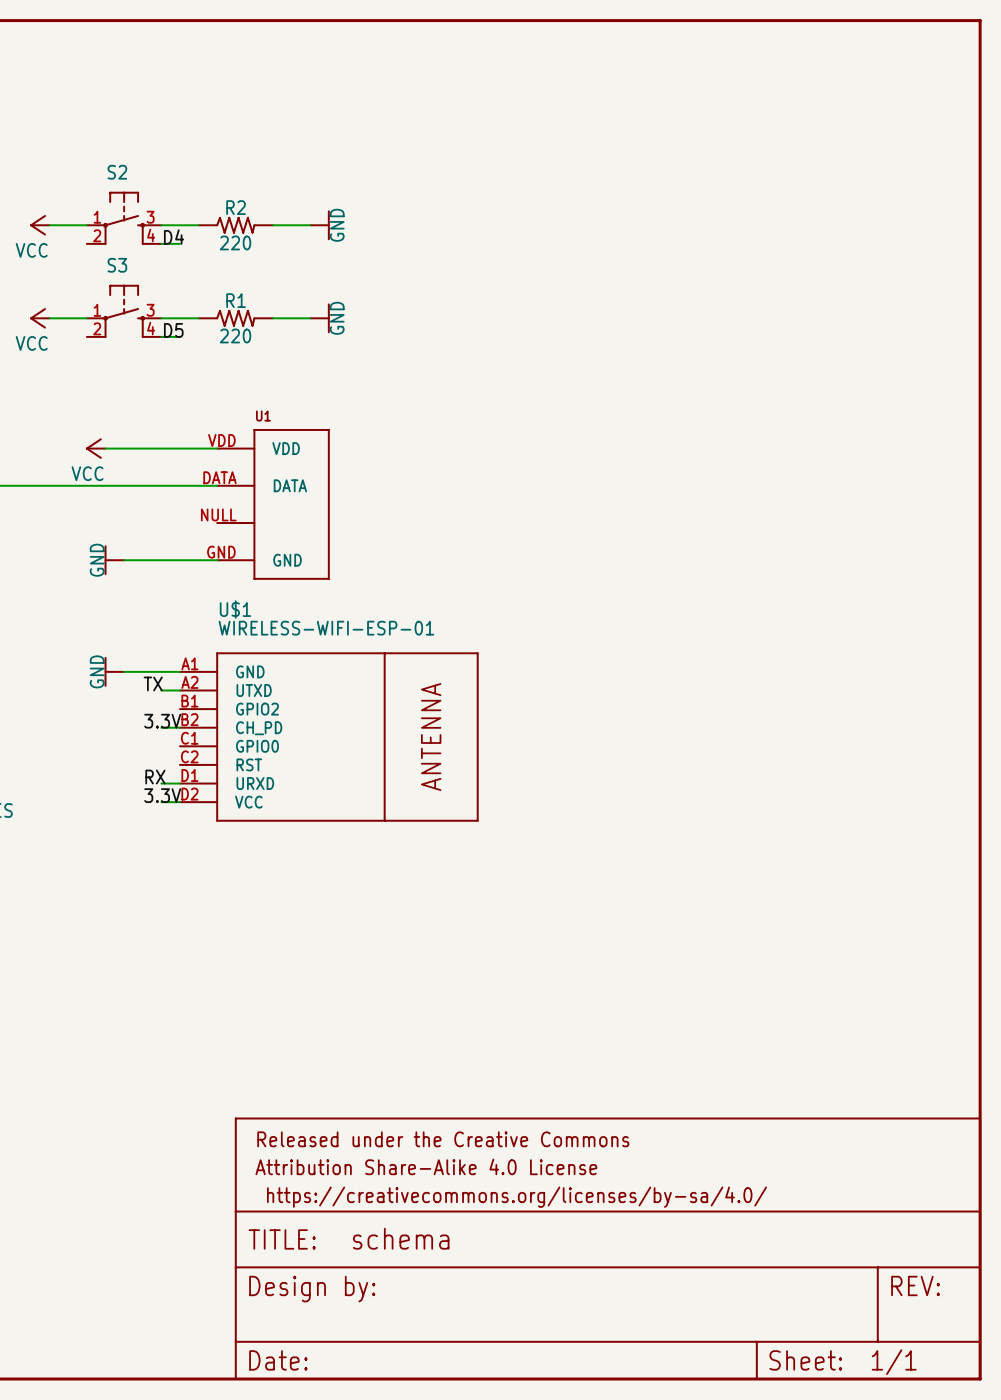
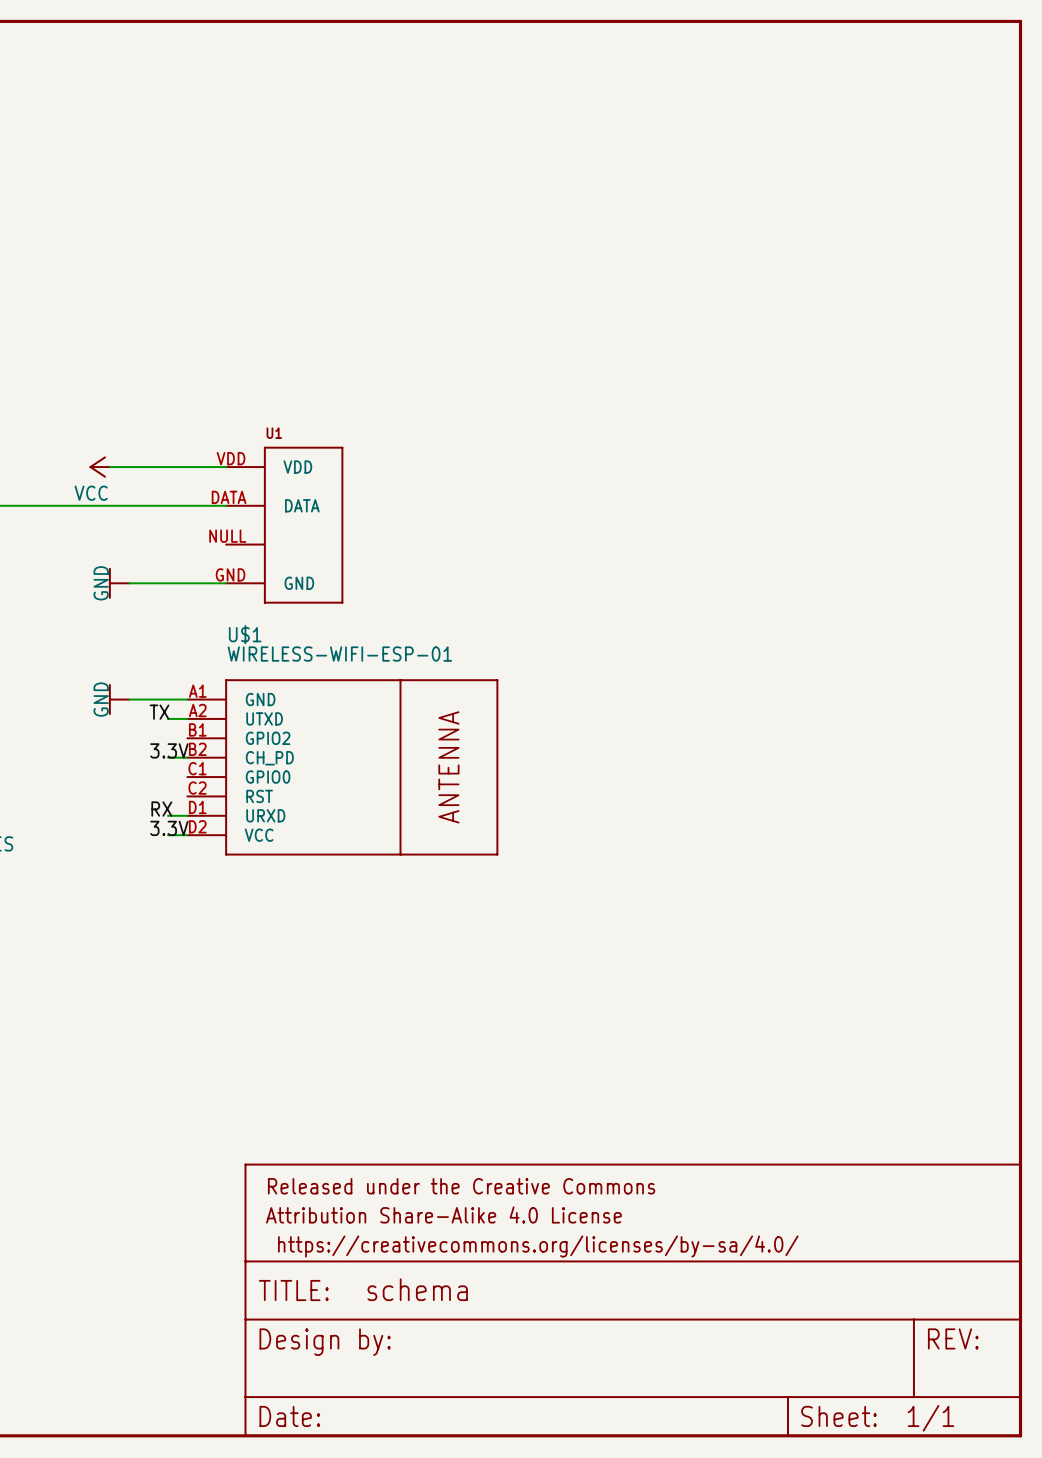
S2: (124, 218) -> none
power symbol: VCC (39, 225) -> none
wire: (49, 225) (86, 225) -> none
wire: (161, 225) (198, 225) -> none
R2: 220 (235, 225) -> none
wire: (273, 225) (310, 225) -> none
power symbol: GND (319, 225) -> none
label: D4 (174, 237) -> none
wire: (161, 243) (179, 243) -> none
S3: (124, 311) -> none
power symbol: VCC (39, 318) -> none
wire: (49, 318) (86, 318) -> none
wire: (161, 318) (198, 318) -> none
R1: 220 (235, 318) -> none
wire: (273, 318) (310, 318) -> none
power symbol: GND (319, 318) -> none
label: D5 (173, 330) -> none
wire: (161, 336) (179, 336) -> none

